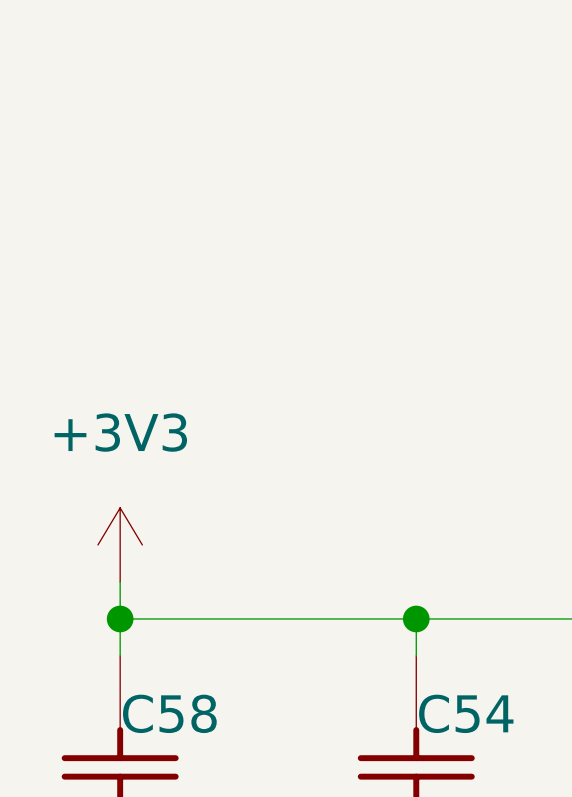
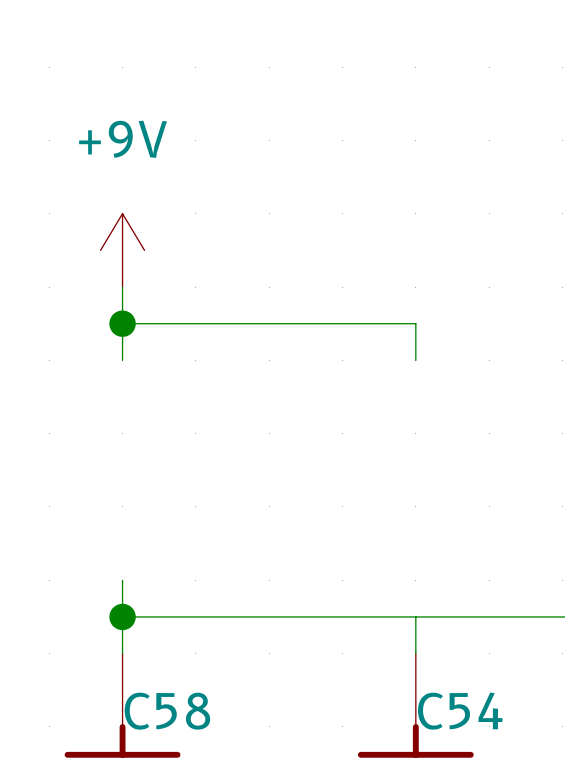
power symbol: none -> +9V (122, 250)
wire: none -> (122, 287) (122, 360)
wire: none -> (122, 323) (415, 323) (415, 360)
junction: none -> (122, 323)
power symbol: +3V3 (120, 544) -> none
junction: (416, 618) -> none

